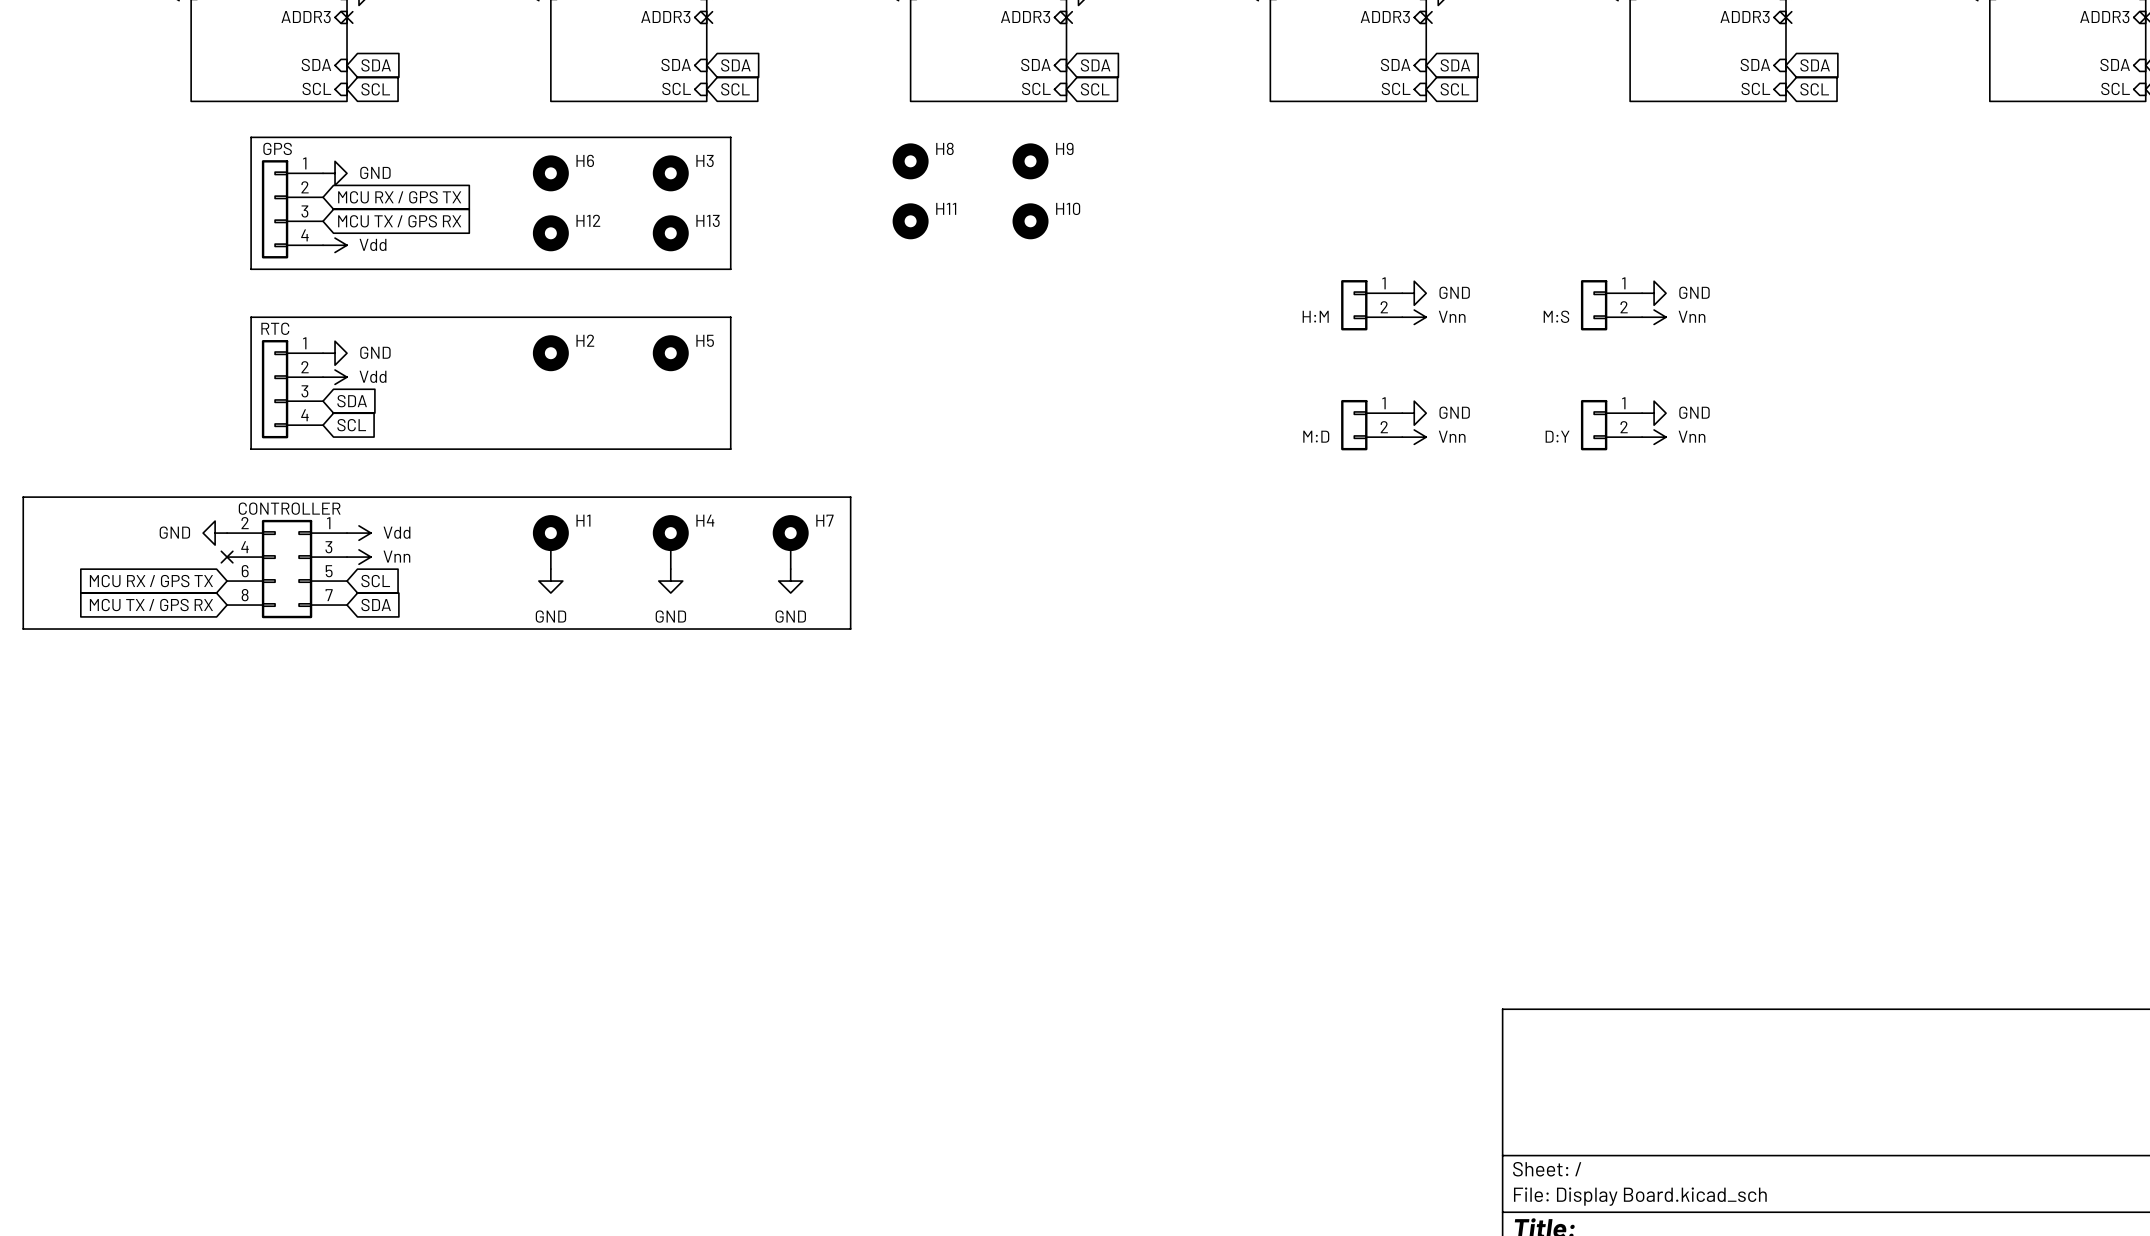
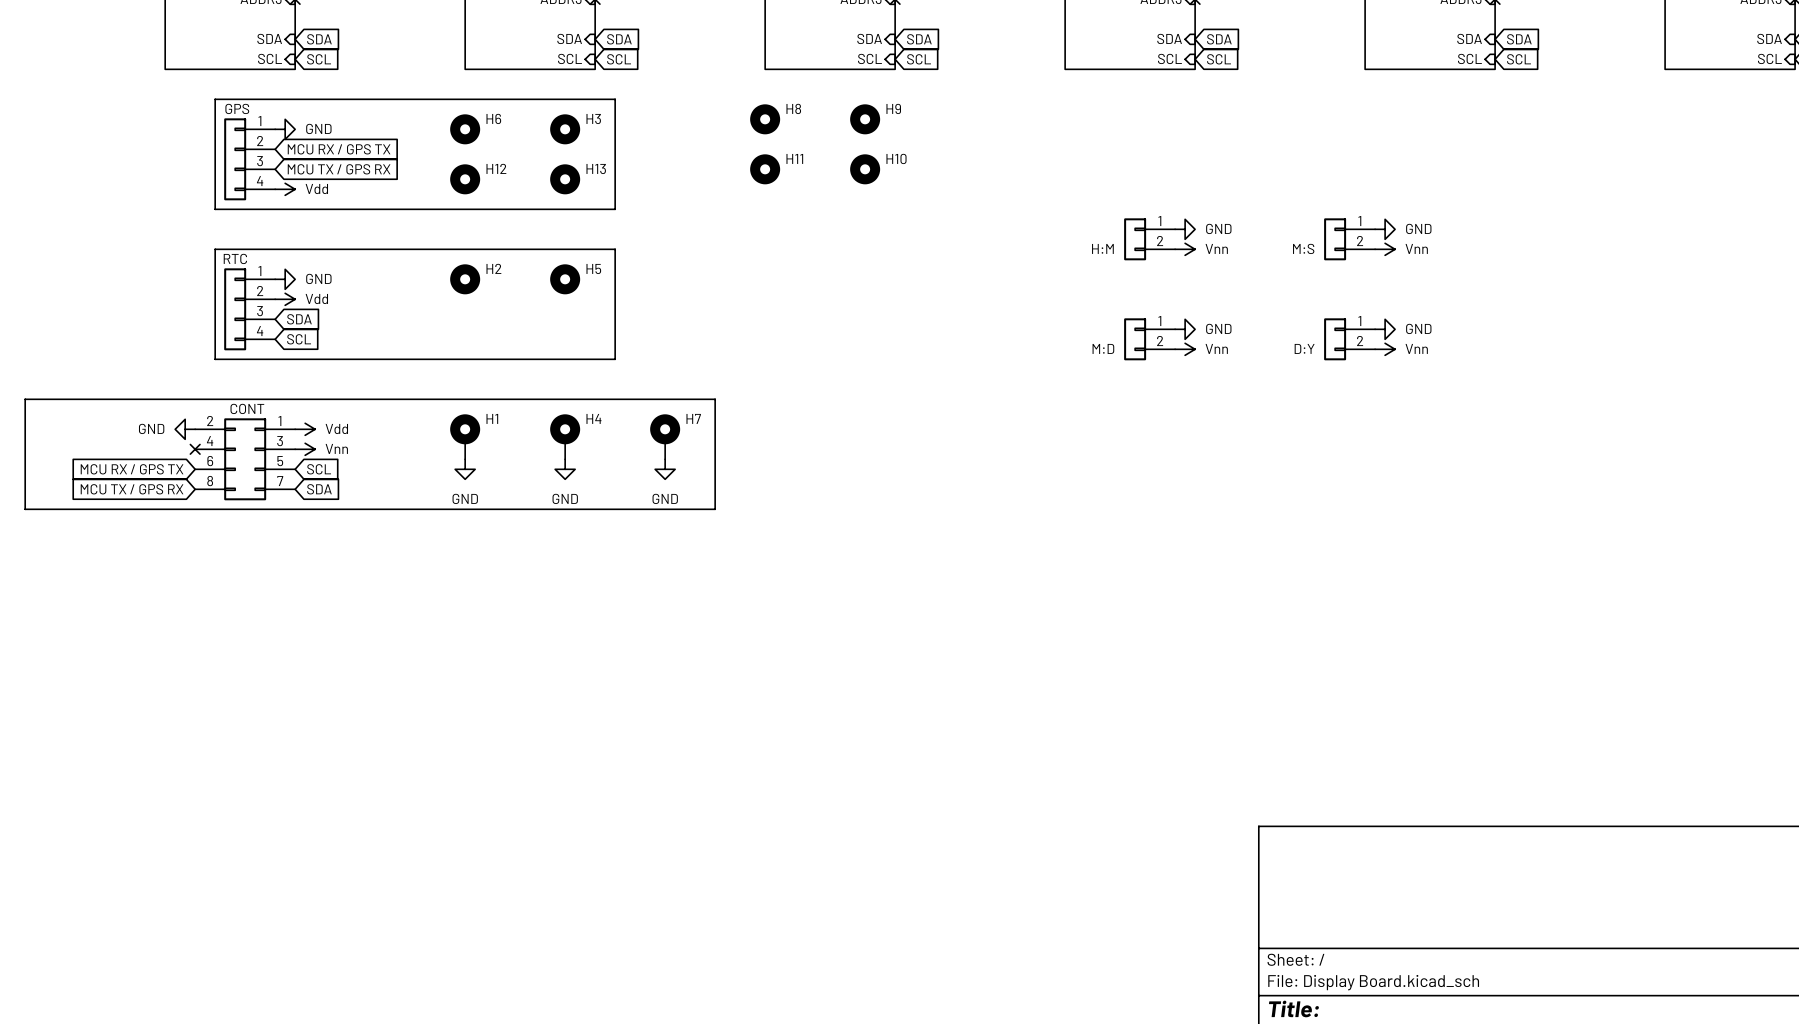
part value: CONTROLLER (289, 508) -> CONT (247, 408)

